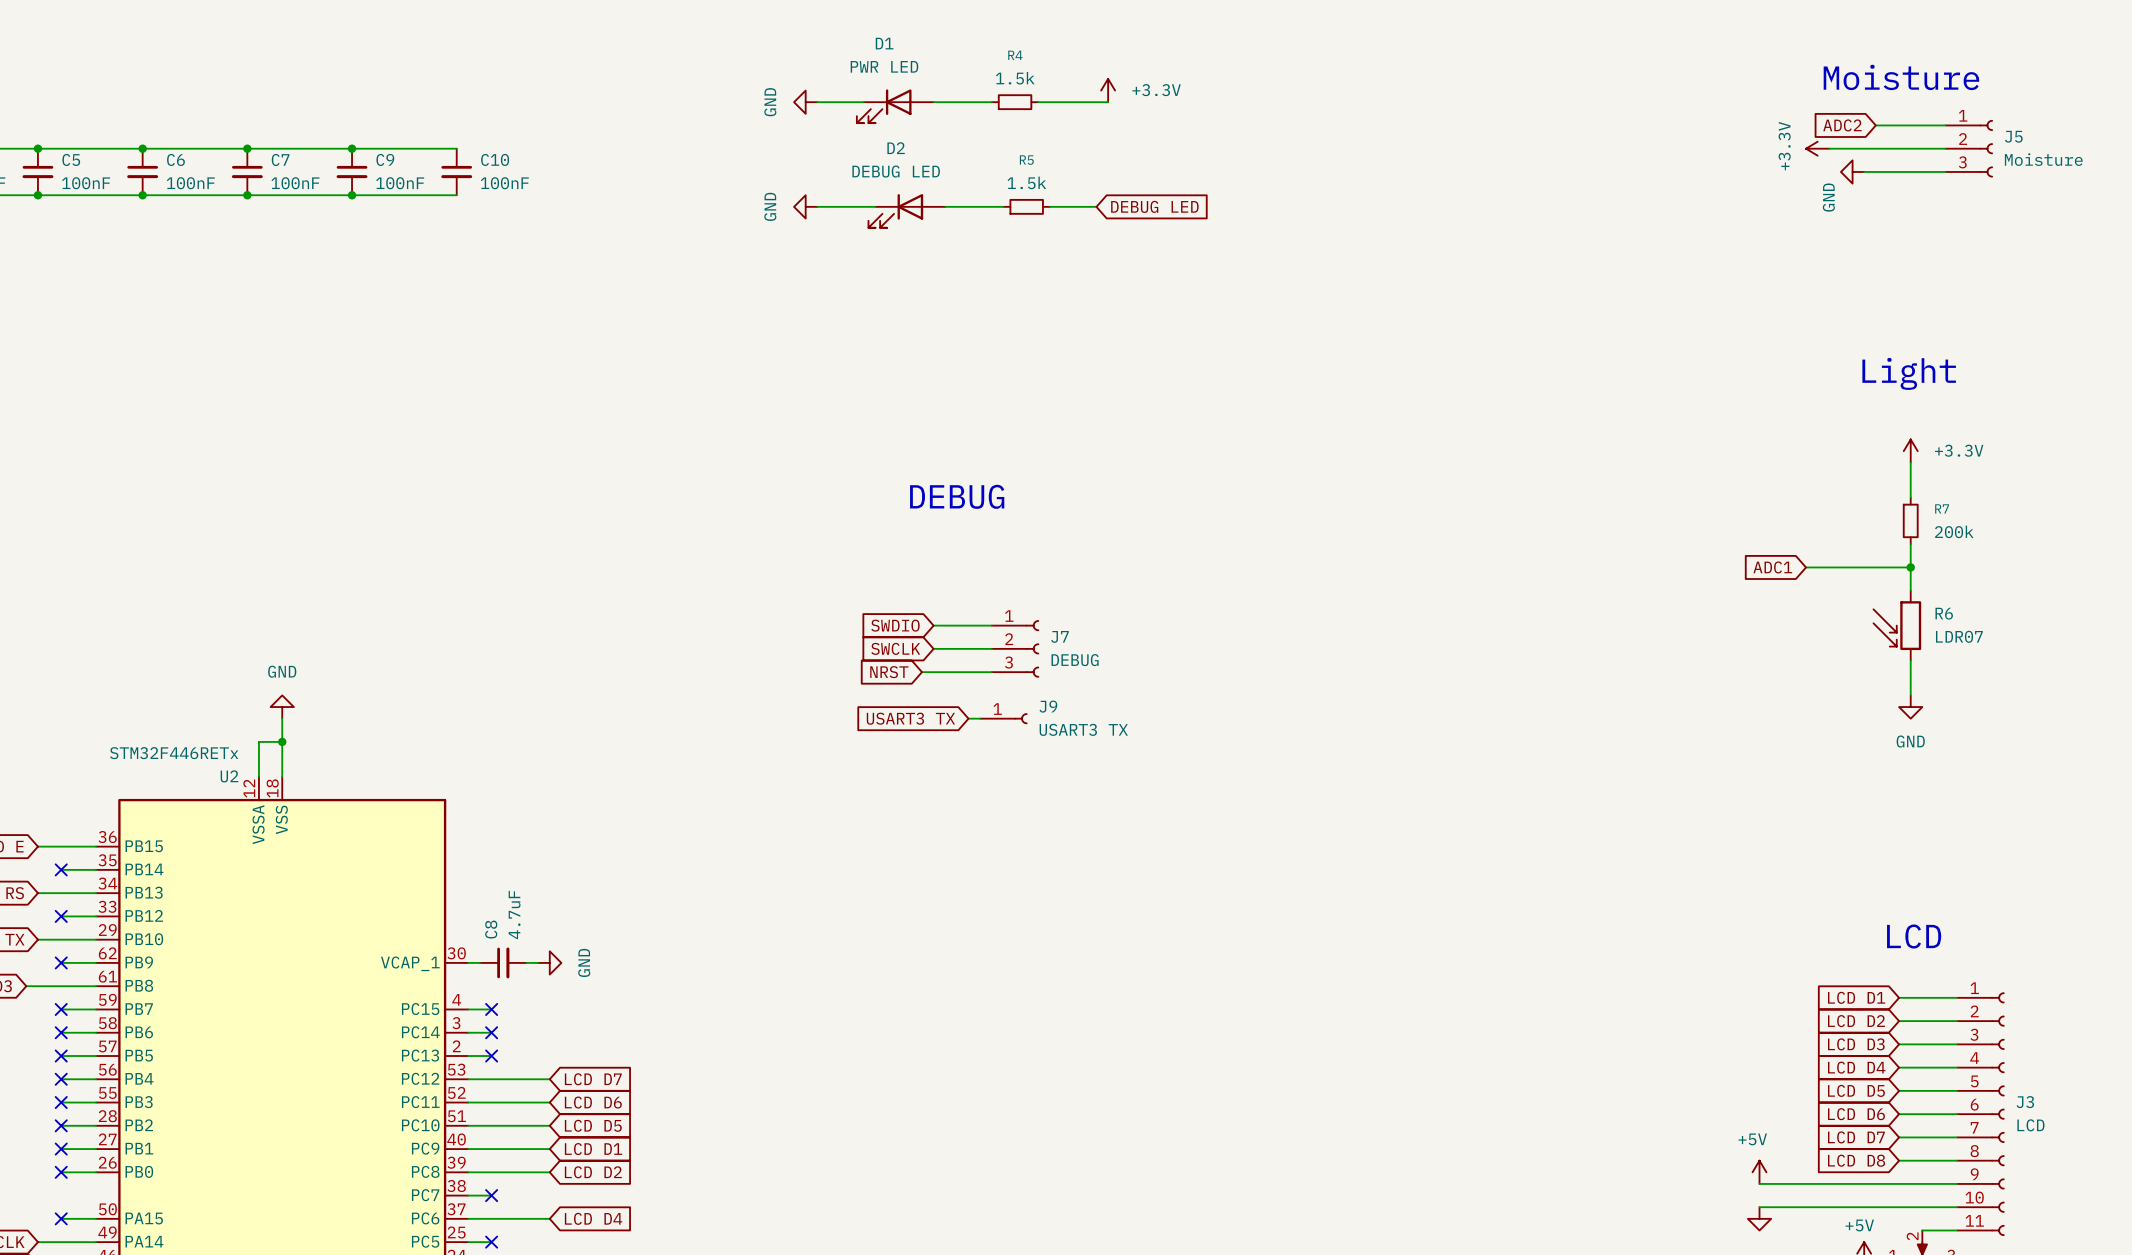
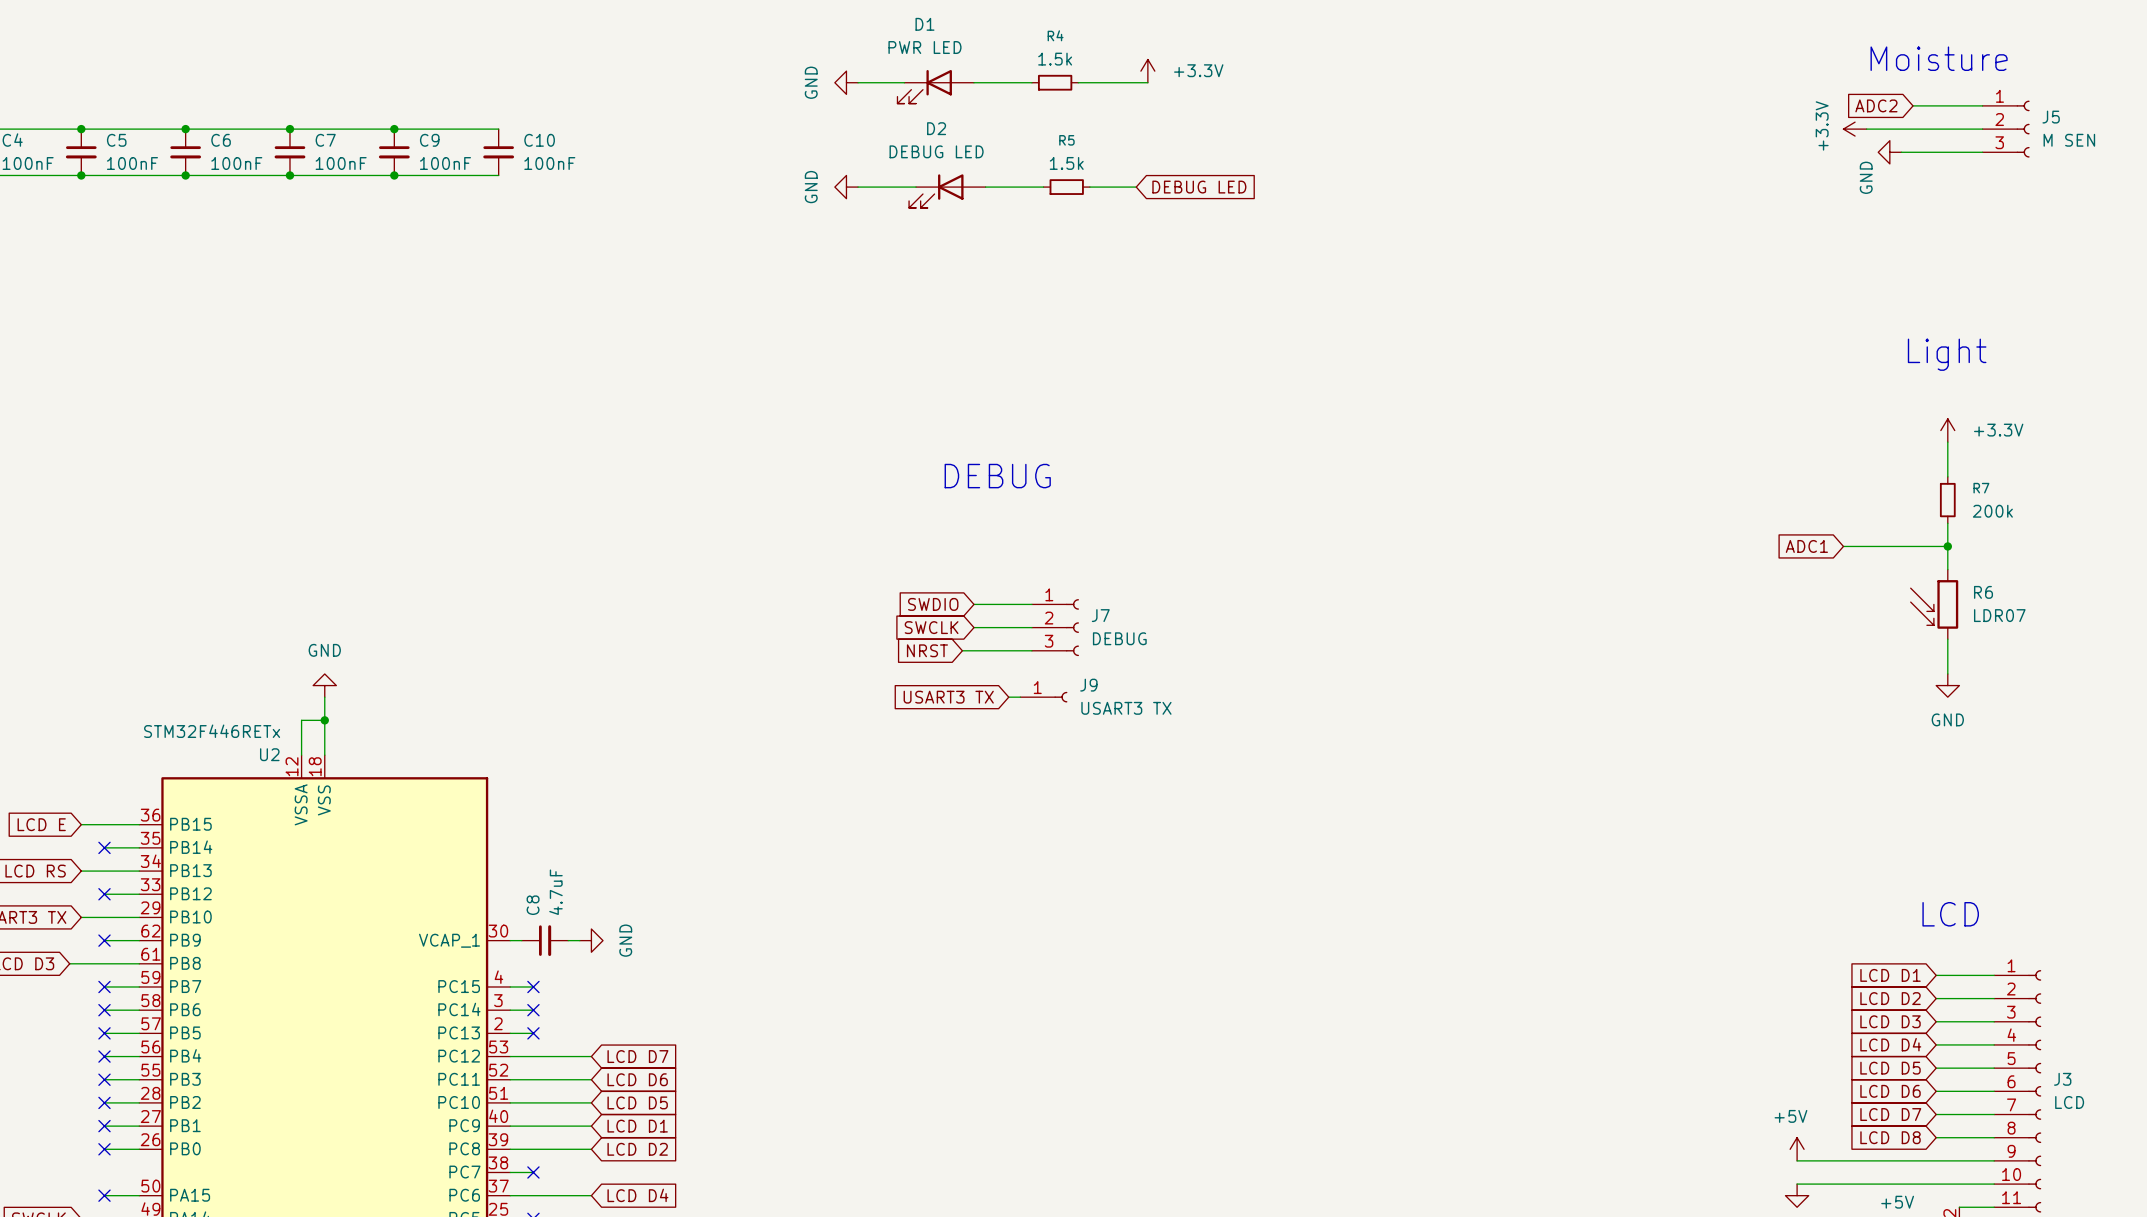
J5 value: Moisture (2043, 159) -> M SEN (2069, 140)

